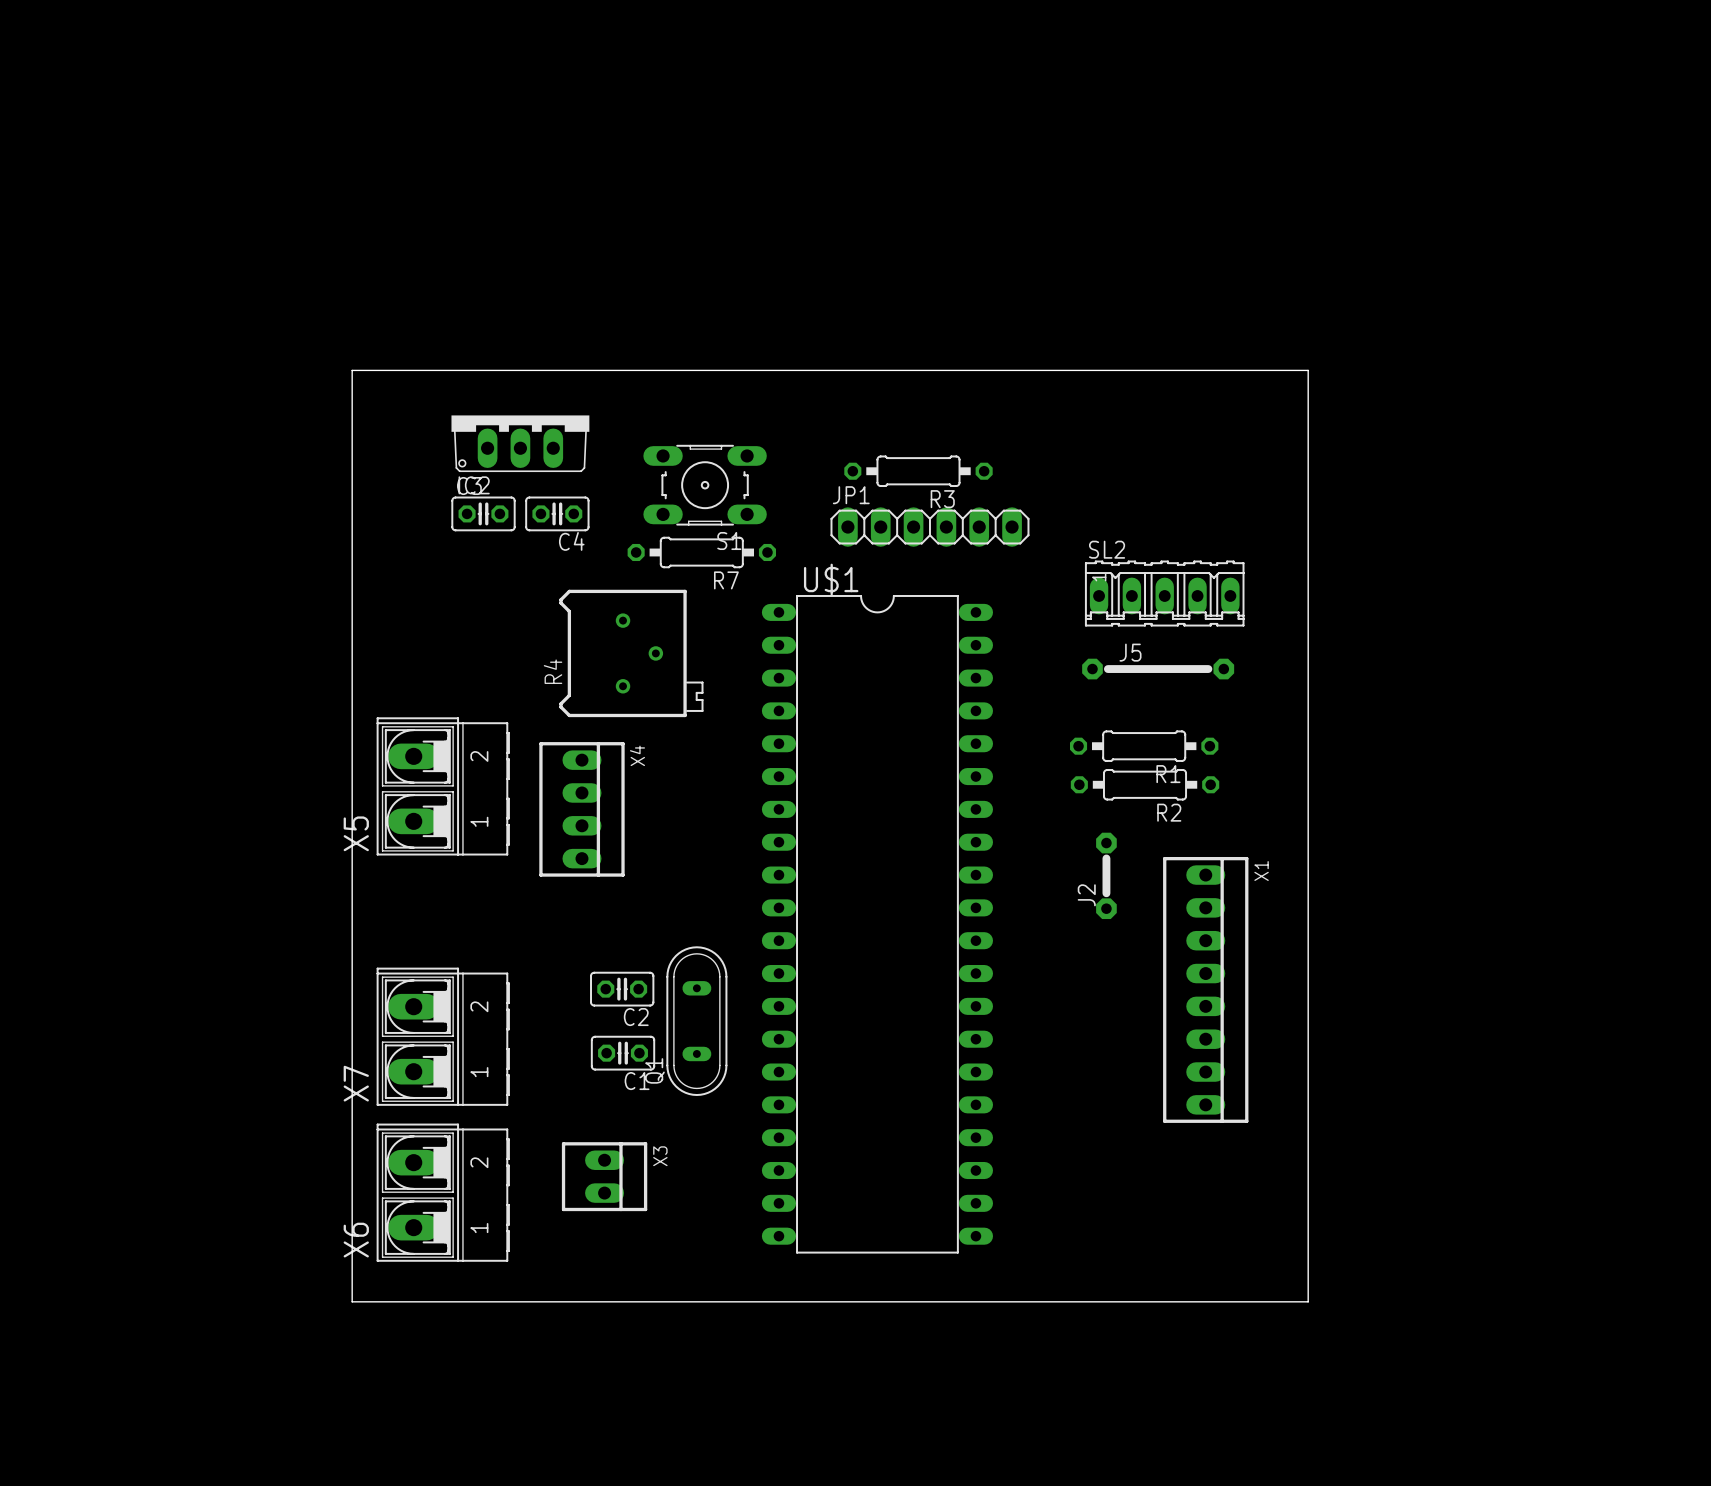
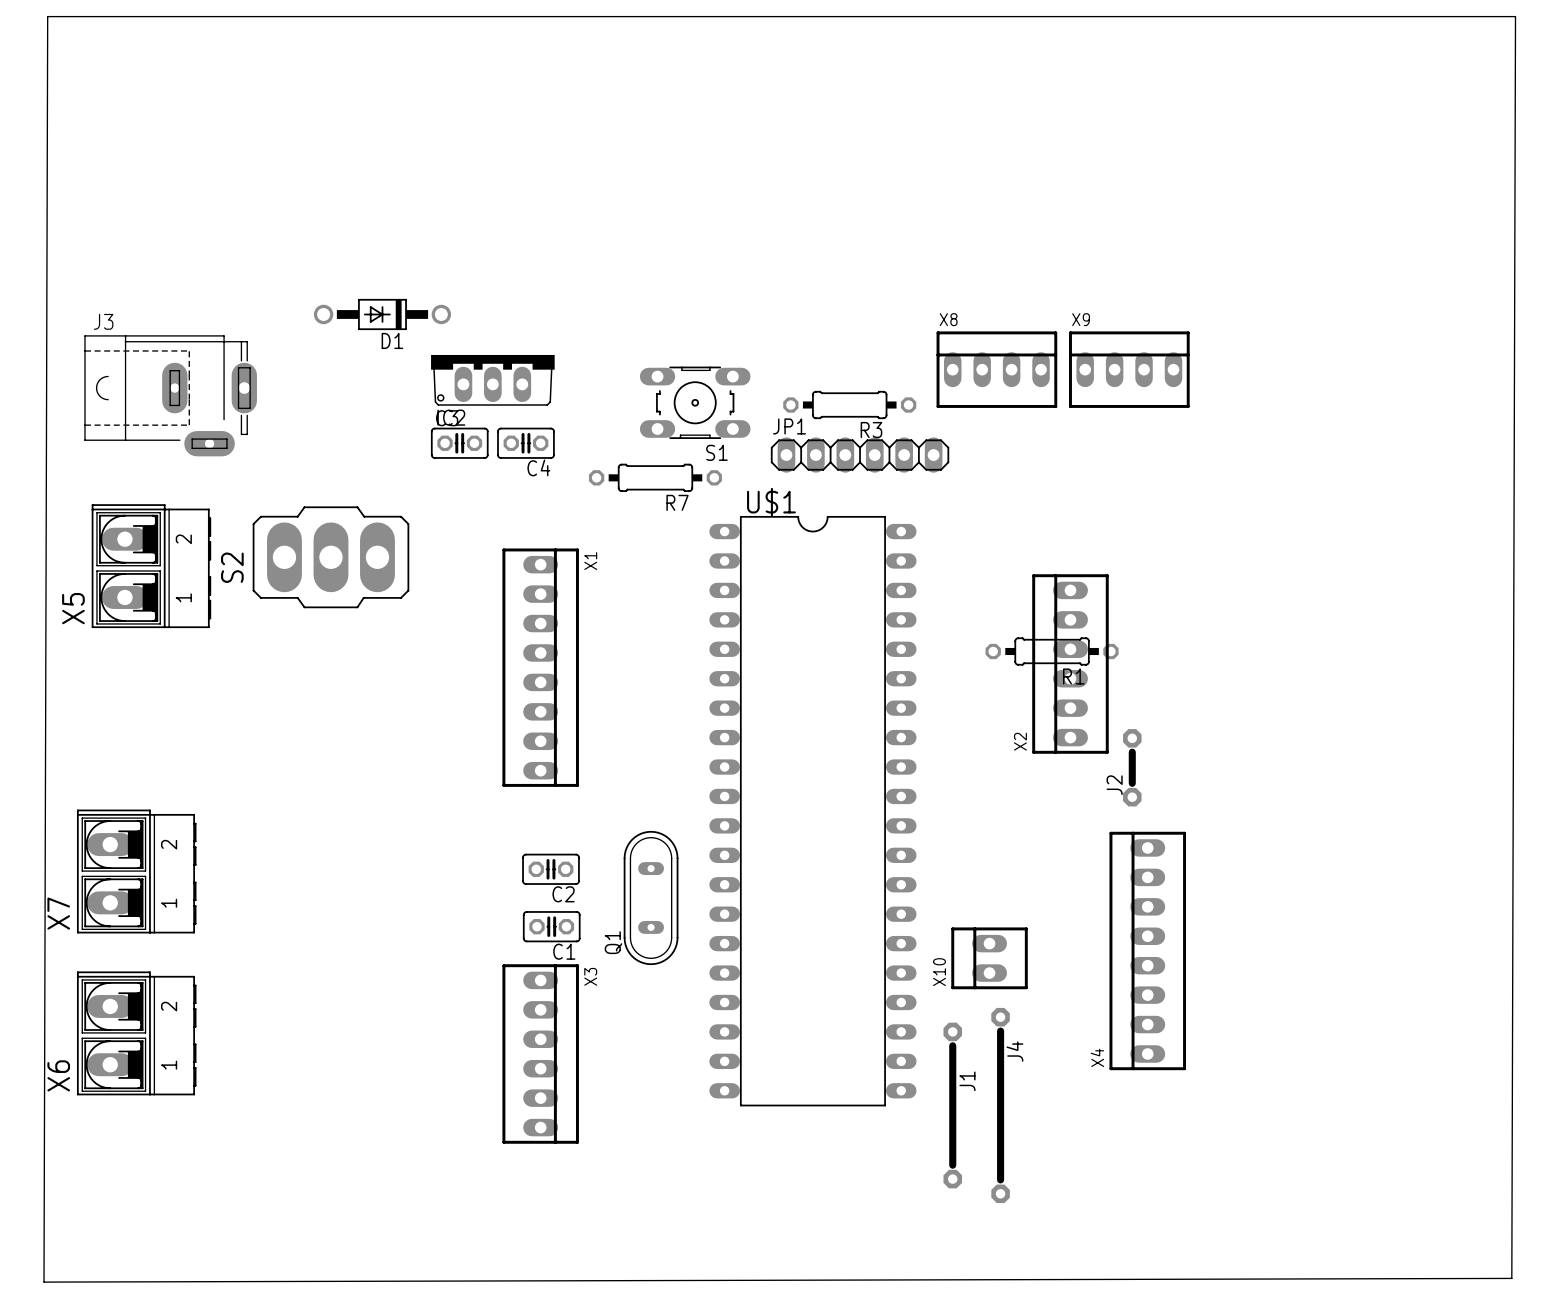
board edge: none -> (47, 16) (1515, 16) (1511, 1278) (44, 1282) (47, 16)
board edge: (352, 370) (1308, 370) (1308, 1301) (352, 1301) (352, 370) -> none
D1: none -> (382, 314)
X8: none -> (996, 369)
X9: none -> (1129, 369)
J3: none -> (170, 395)
S1 position: (705, 485) -> (695, 402)
SL2: (1164, 593) -> none
S2: none -> (330, 557)
R4: (631, 653) -> none
J5: (1158, 669) -> none
X4 footprint: [539, 742, 625, 877] -> [1109, 831, 1187, 1071]
X4 name position: X4 (637, 755) -> X4 (1097, 1057)
X2: none -> (1070, 664)
R2: (1145, 784) -> none
X5 position: (443, 786) -> (151, 566)
J2 position: (1106, 875) -> (1132, 767)
C2 position: (622, 989) -> (550, 869)
X1 position: (1205, 989) -> (540, 667)
X7 position: (443, 1036) -> (136, 871)
C1 position: (623, 1053) -> (551, 926)
X10: none -> (989, 958)
X3 footprint: [561, 1142, 648, 1212] -> [502, 964, 579, 1144]
X3 name position: X3 (660, 1156) -> X3 (590, 976)
X6 position: (443, 1192) -> (136, 1033)
J1: none -> (952, 1105)
J4: none -> (1000, 1105)

